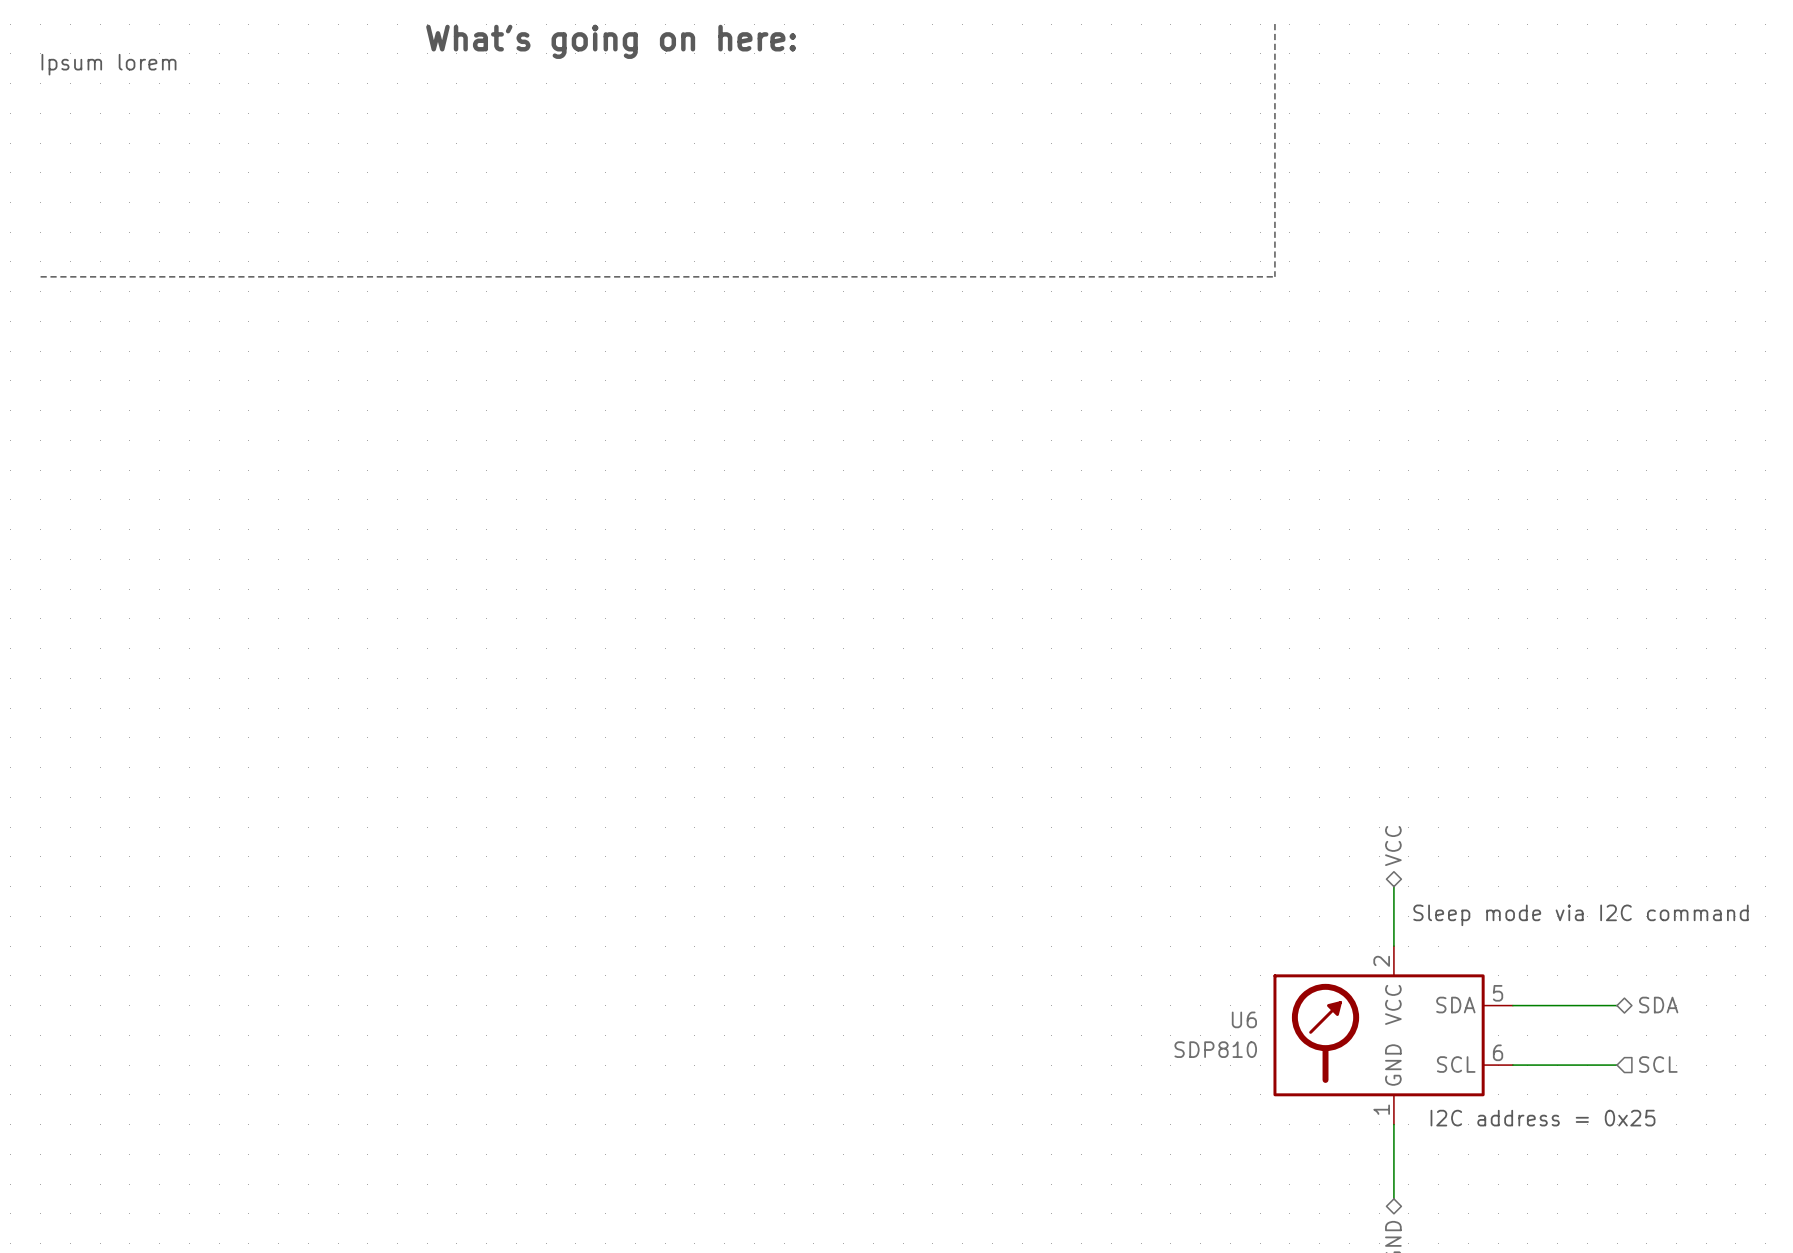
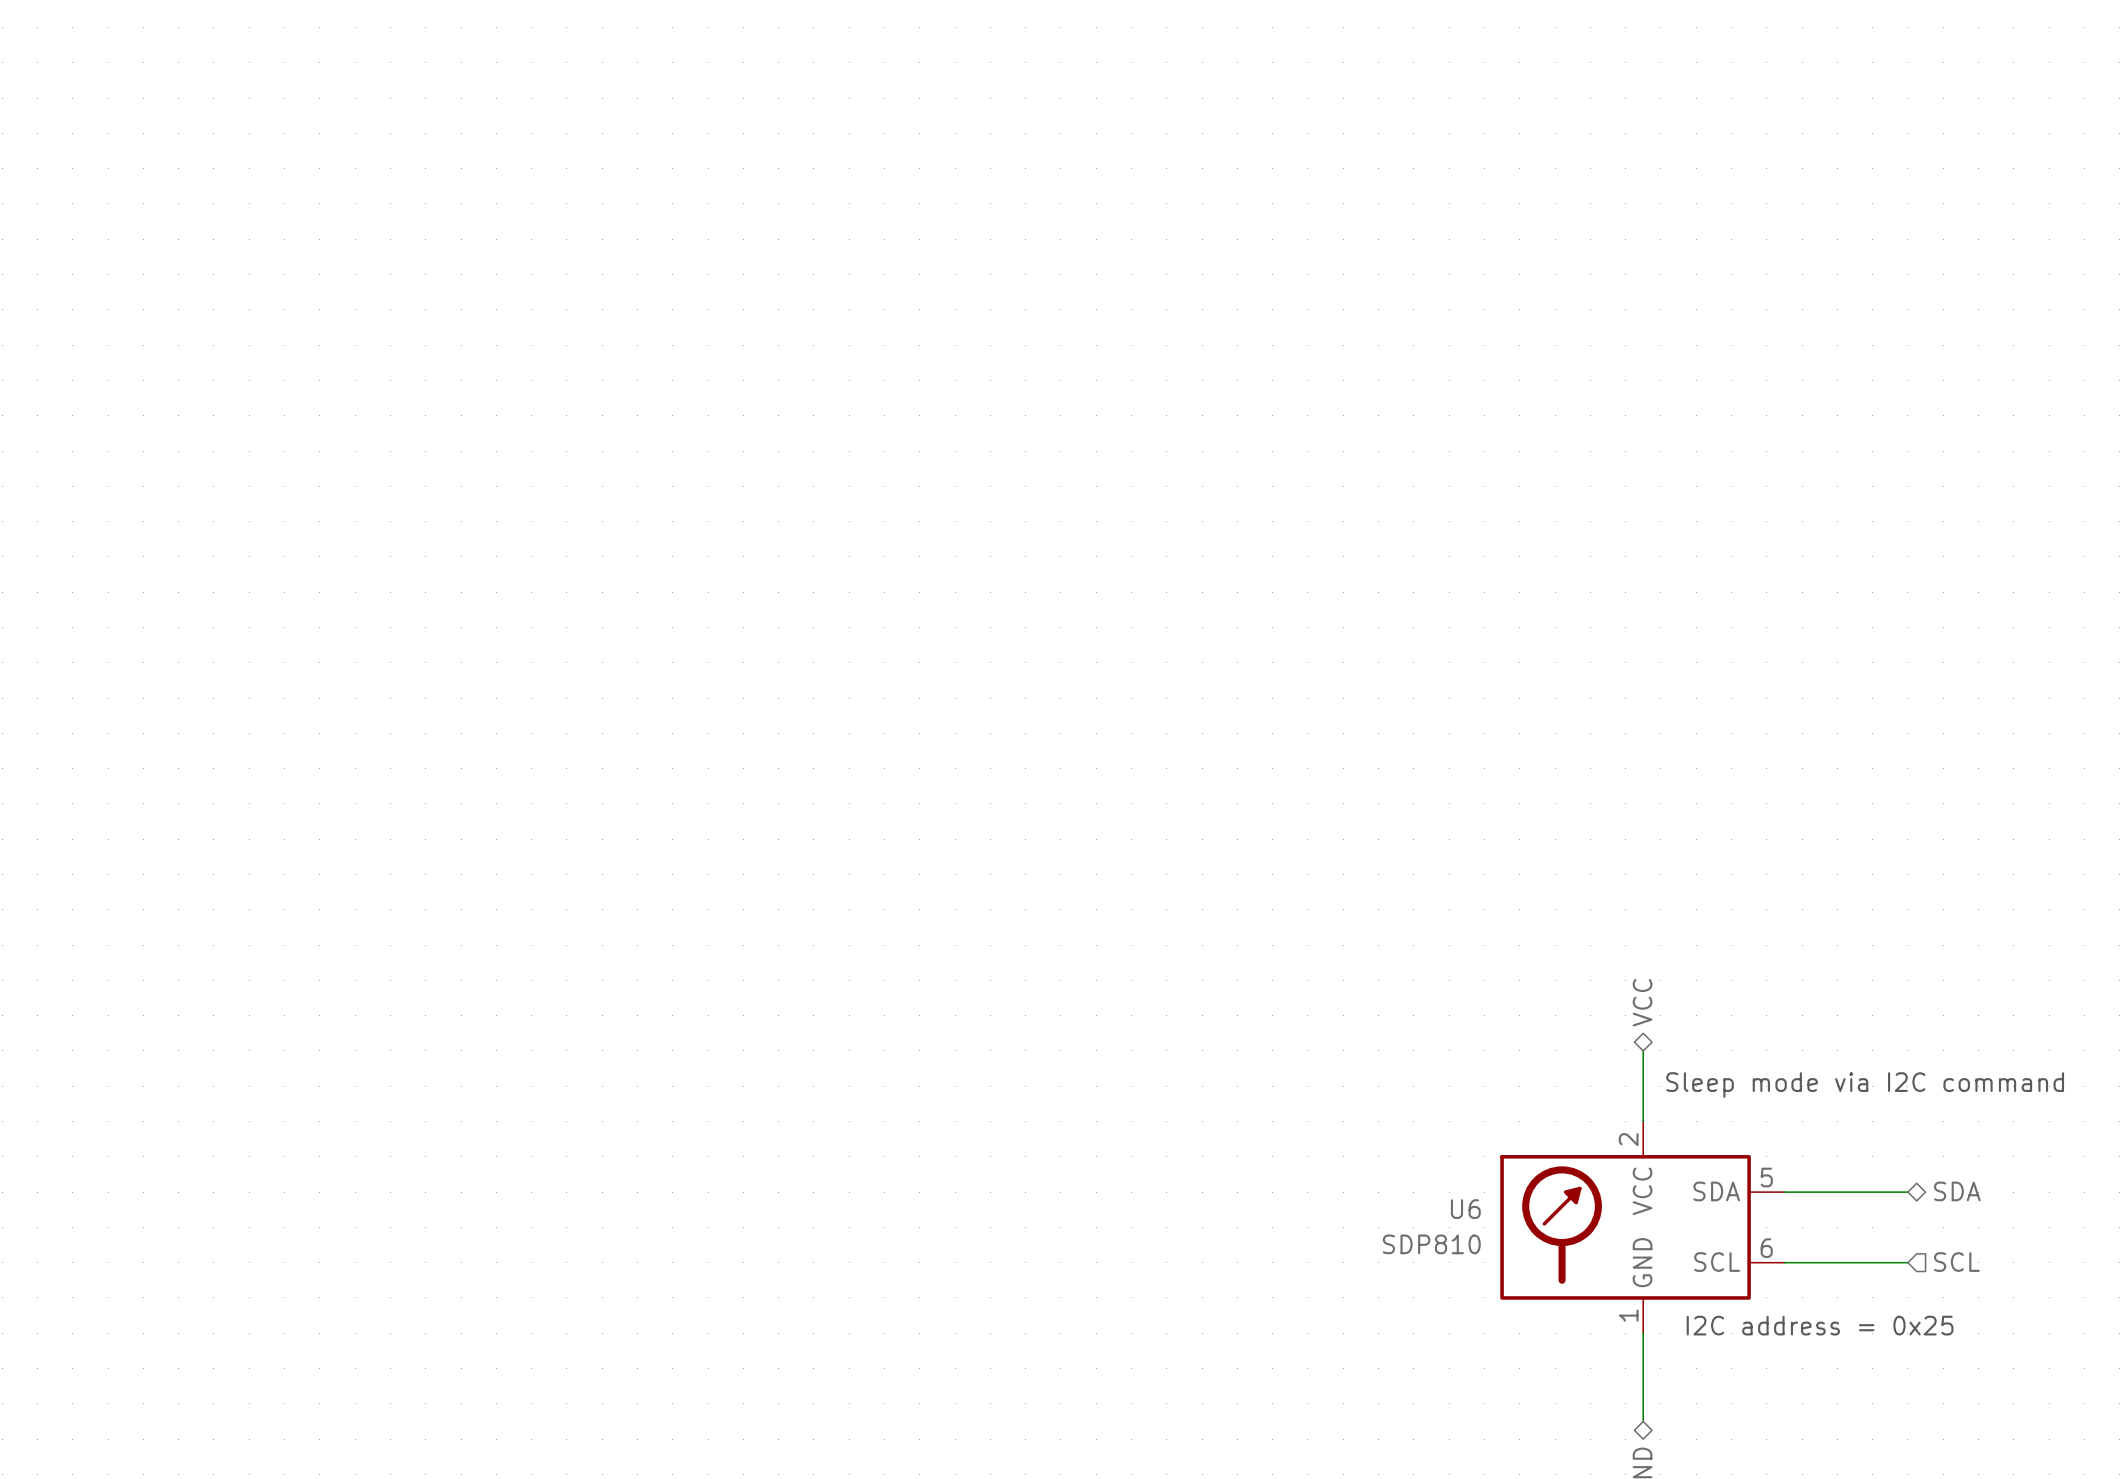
line: (1274, 24) (1274, 276) (40, 276) -> none
text: What's going on here: (611, 41) -> none
text: Ipsum lorem (108, 64) -> none

